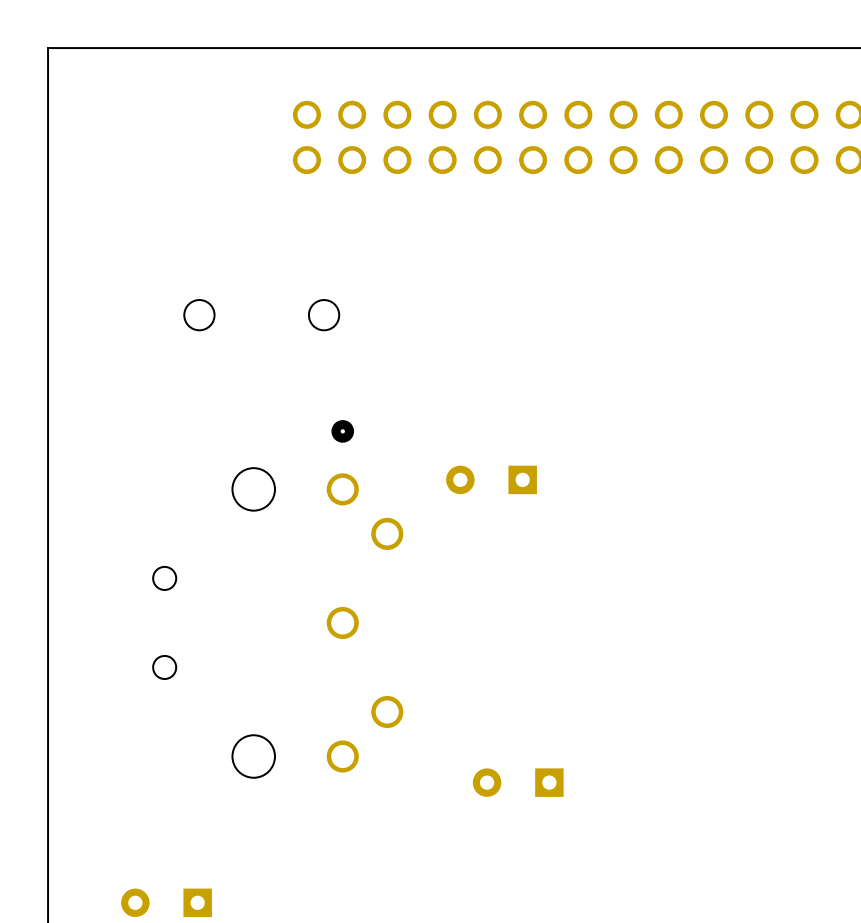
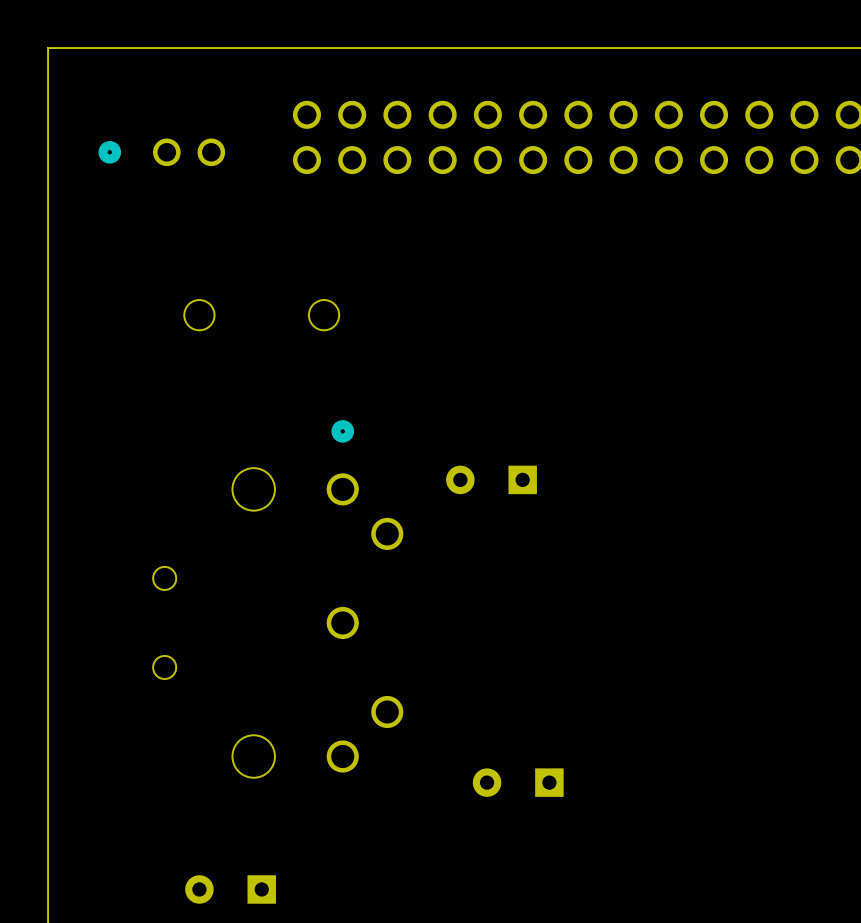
part: none -> (161, 152)
part position: (166, 902) -> (230, 889)

